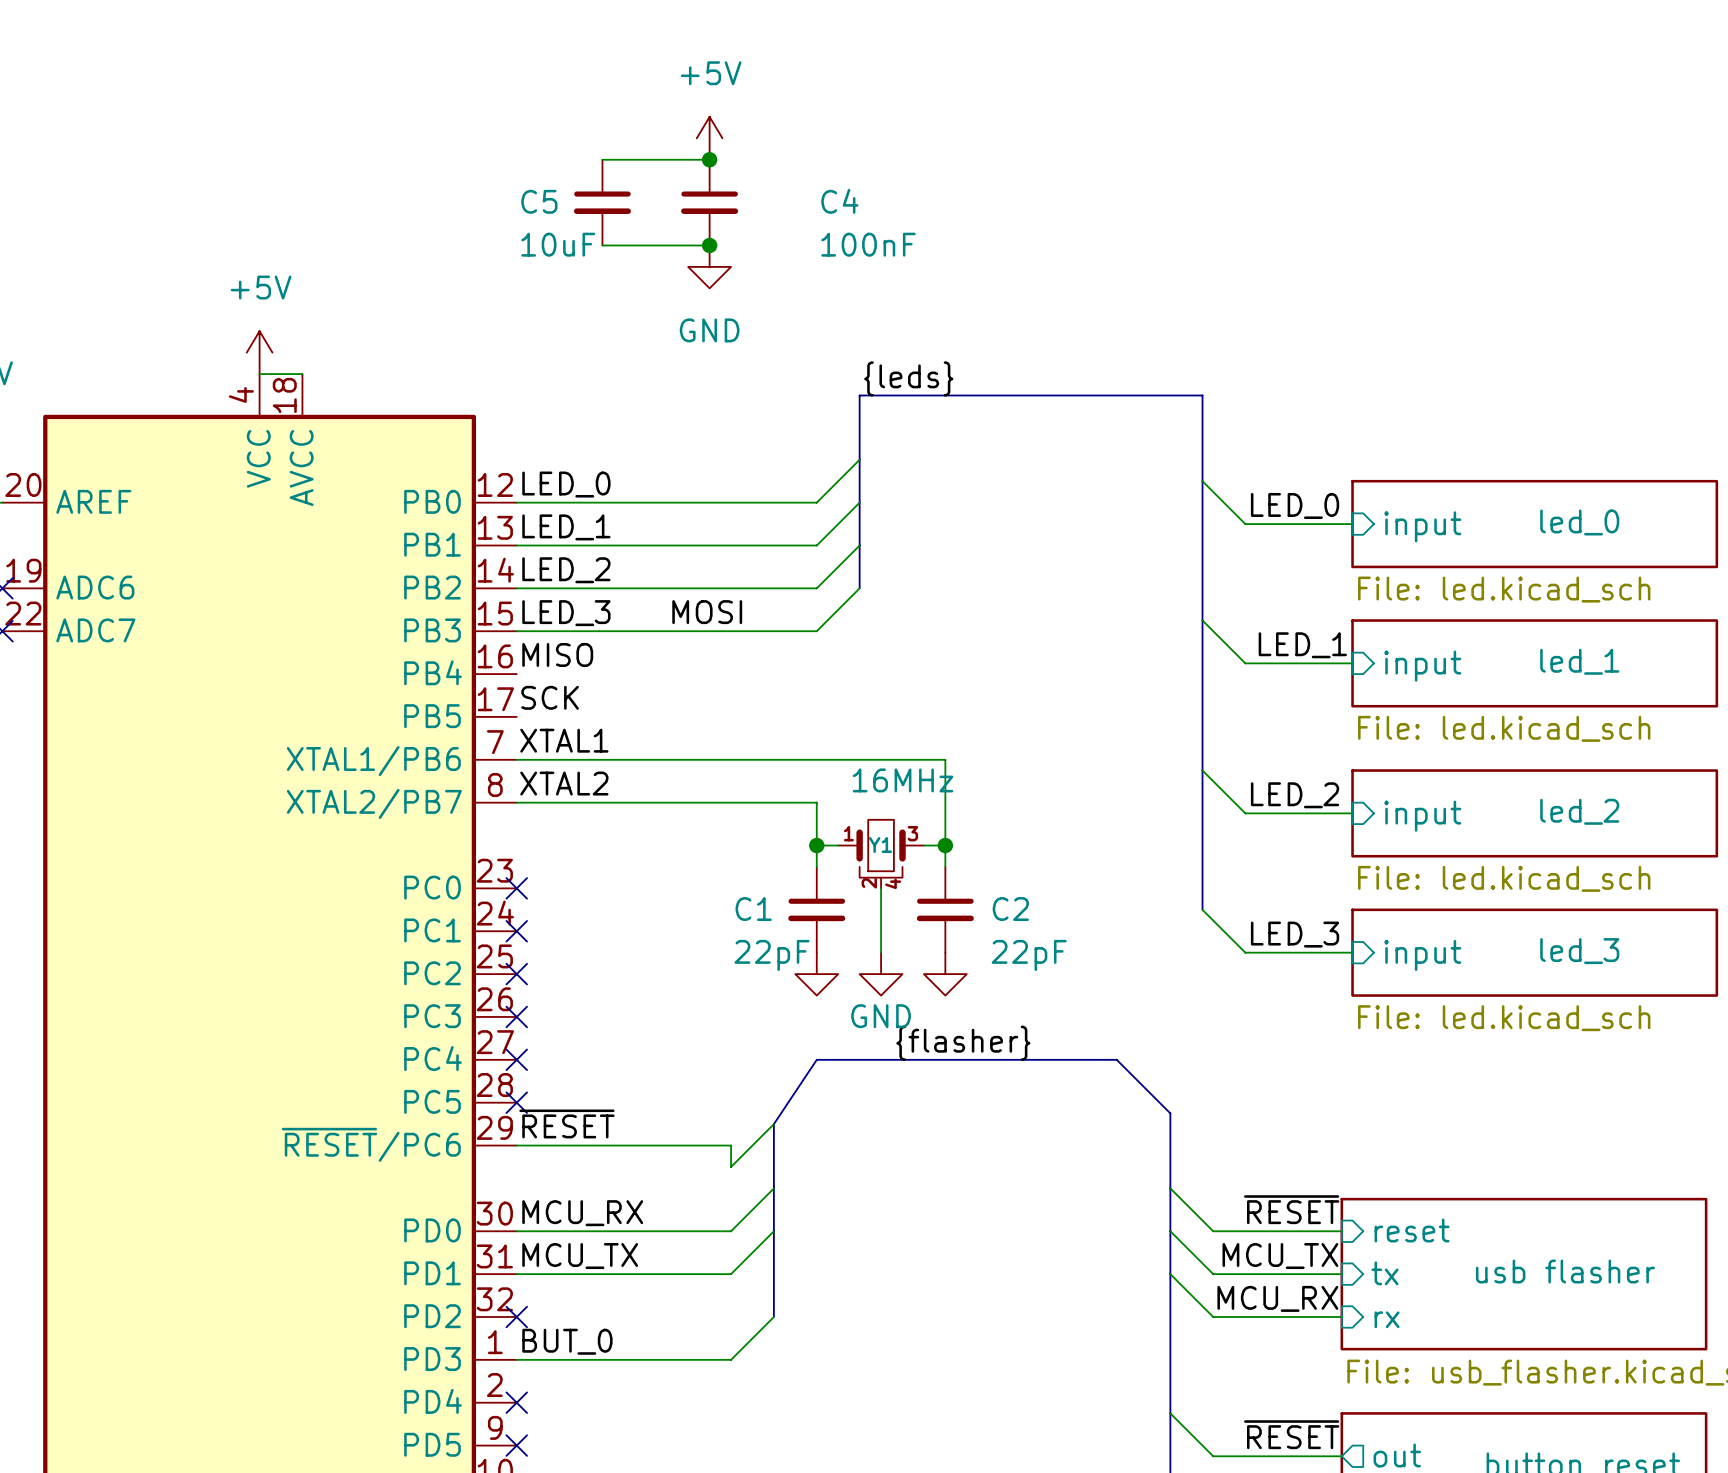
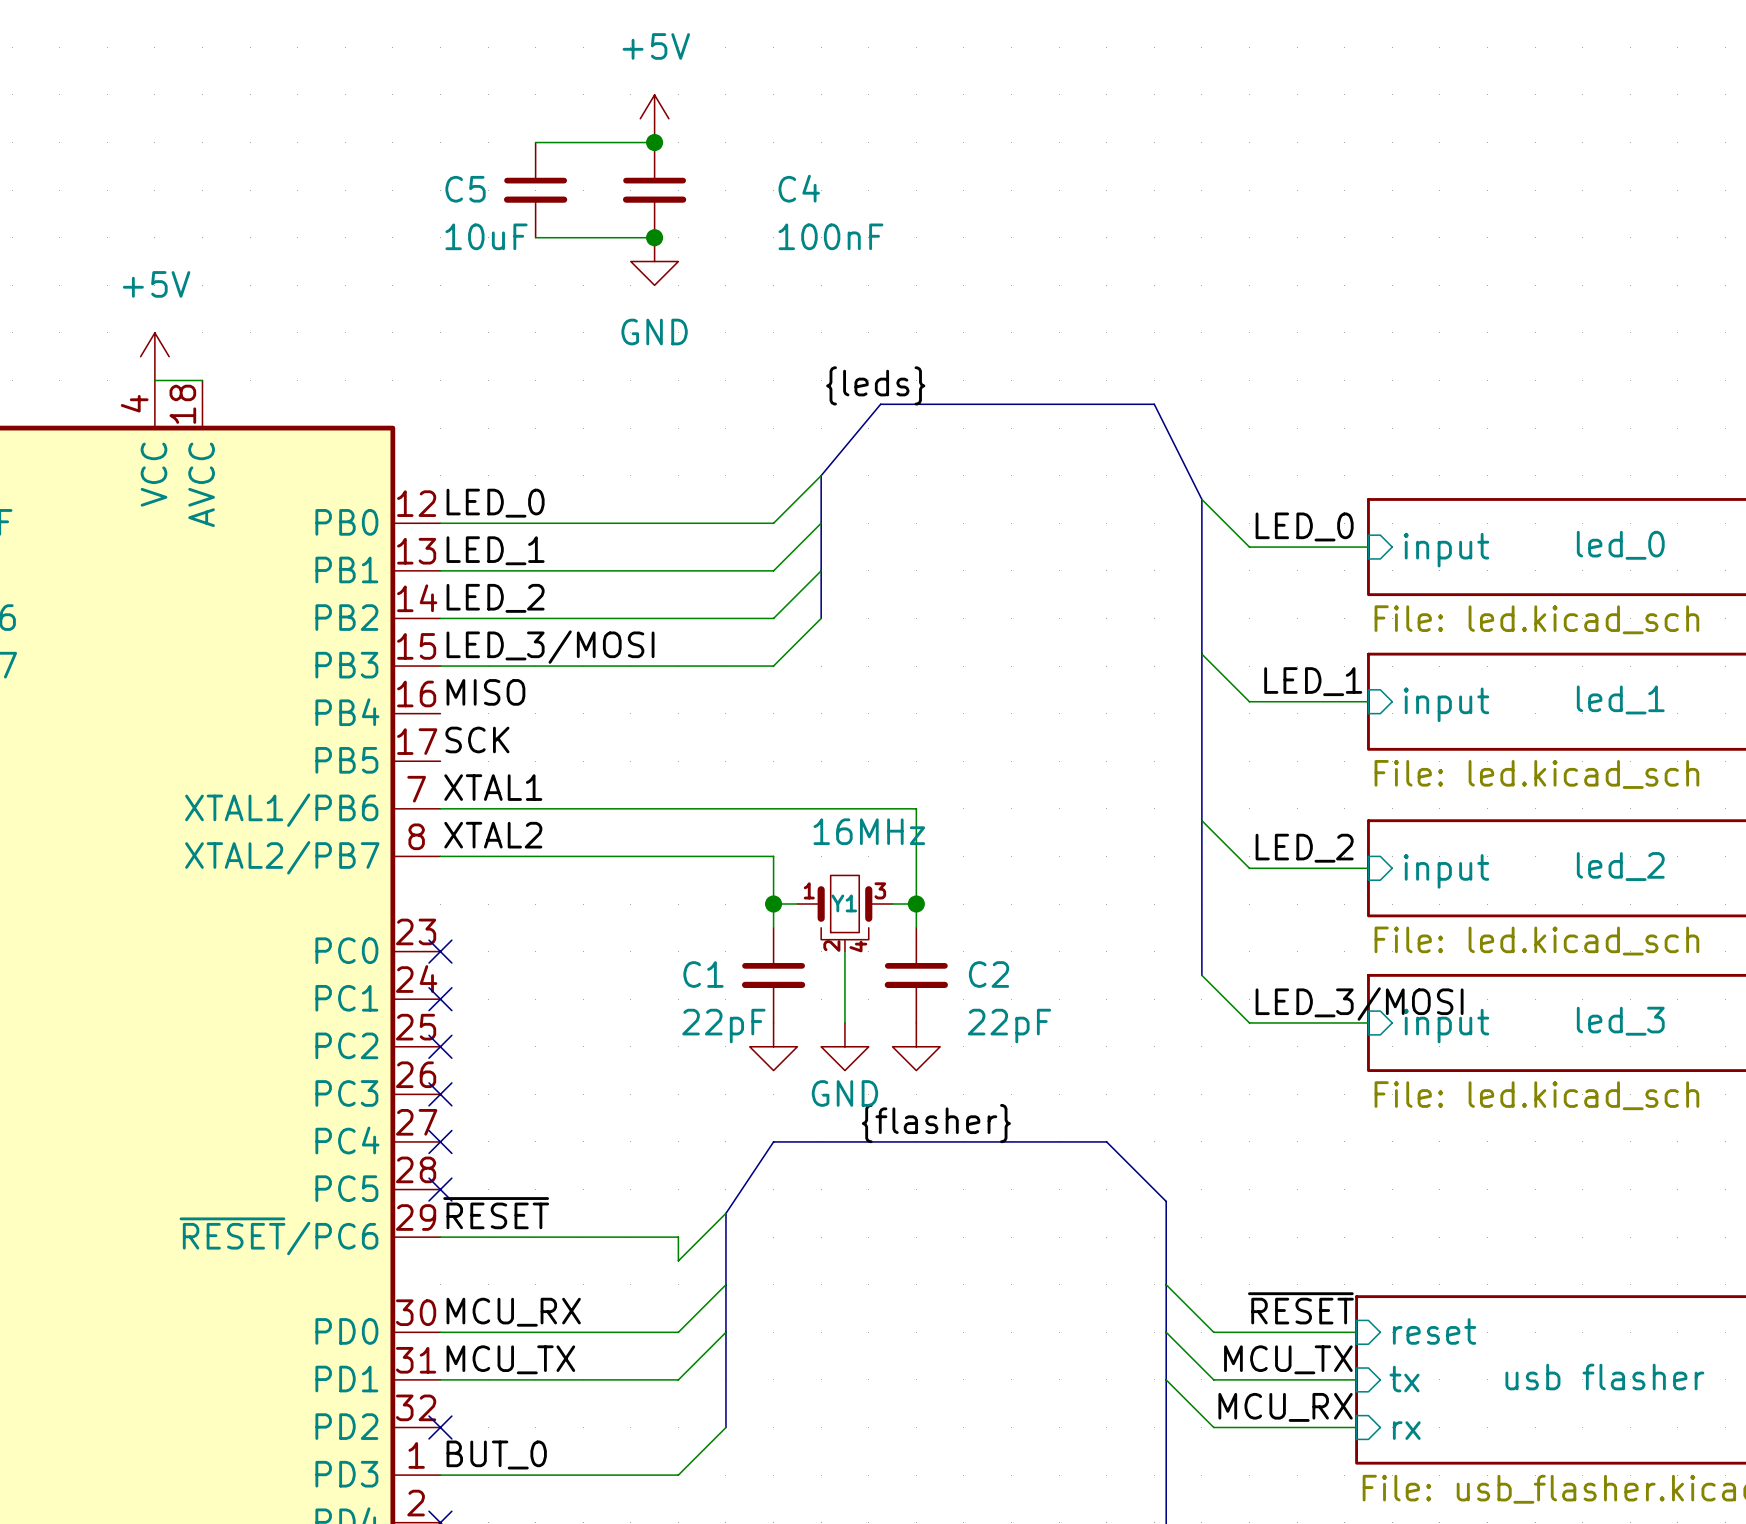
bus: (913, 395) (859, 395) (859, 459) -> (880, 404) (821, 475)
bus: (1159, 395) (1202, 395) (1202, 481) -> (1154, 404) (1201, 499)
label: MOSI (707, 612) -> none
label: LED_3 (566, 613) -> LED_3/MOSI (550, 647)
label: LED_3 (1295, 934) -> LED_3/MOSI (1359, 1004)

